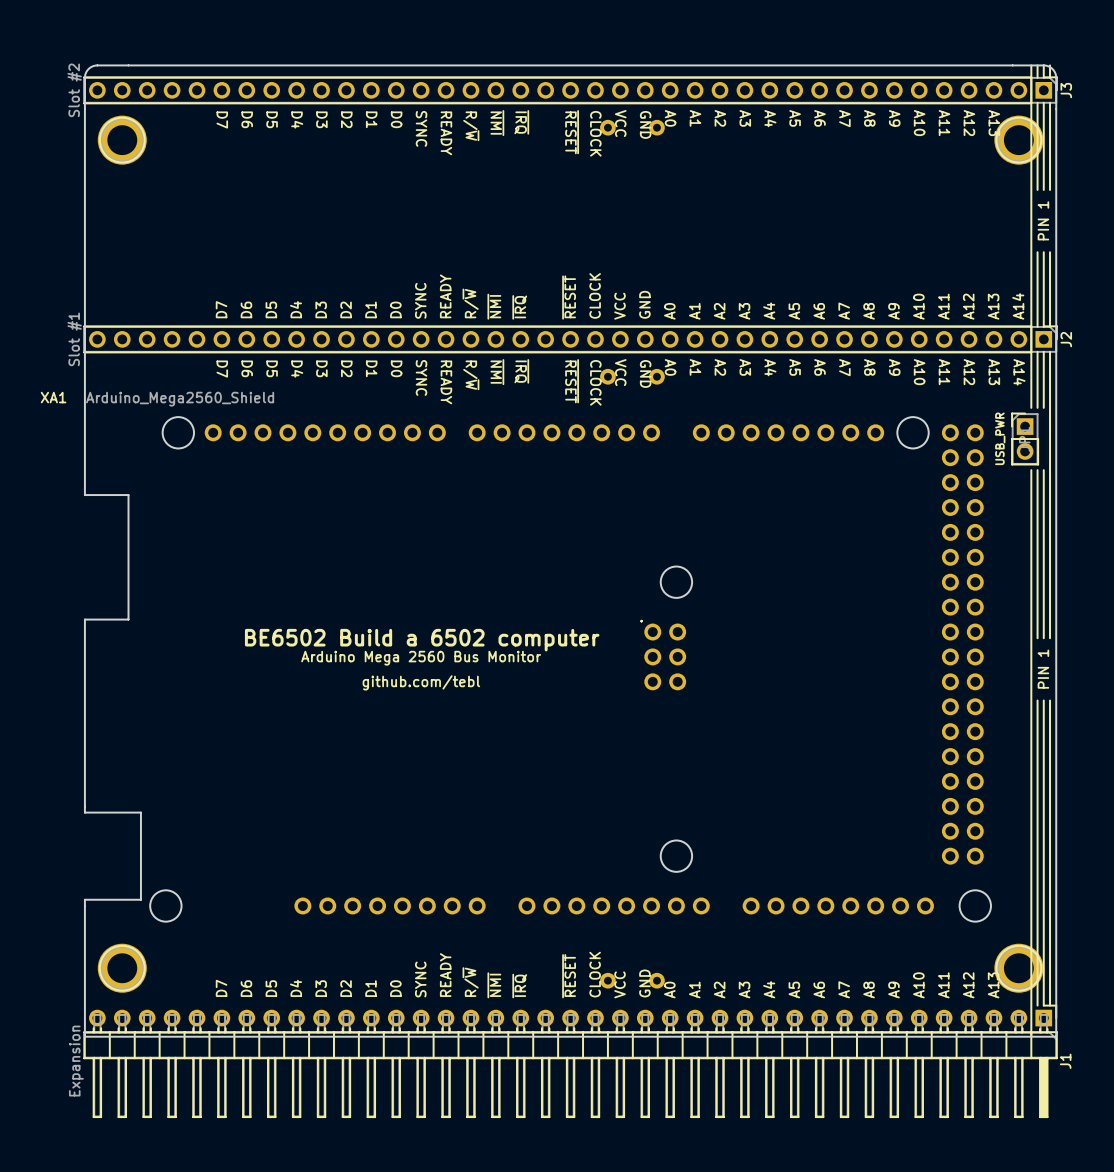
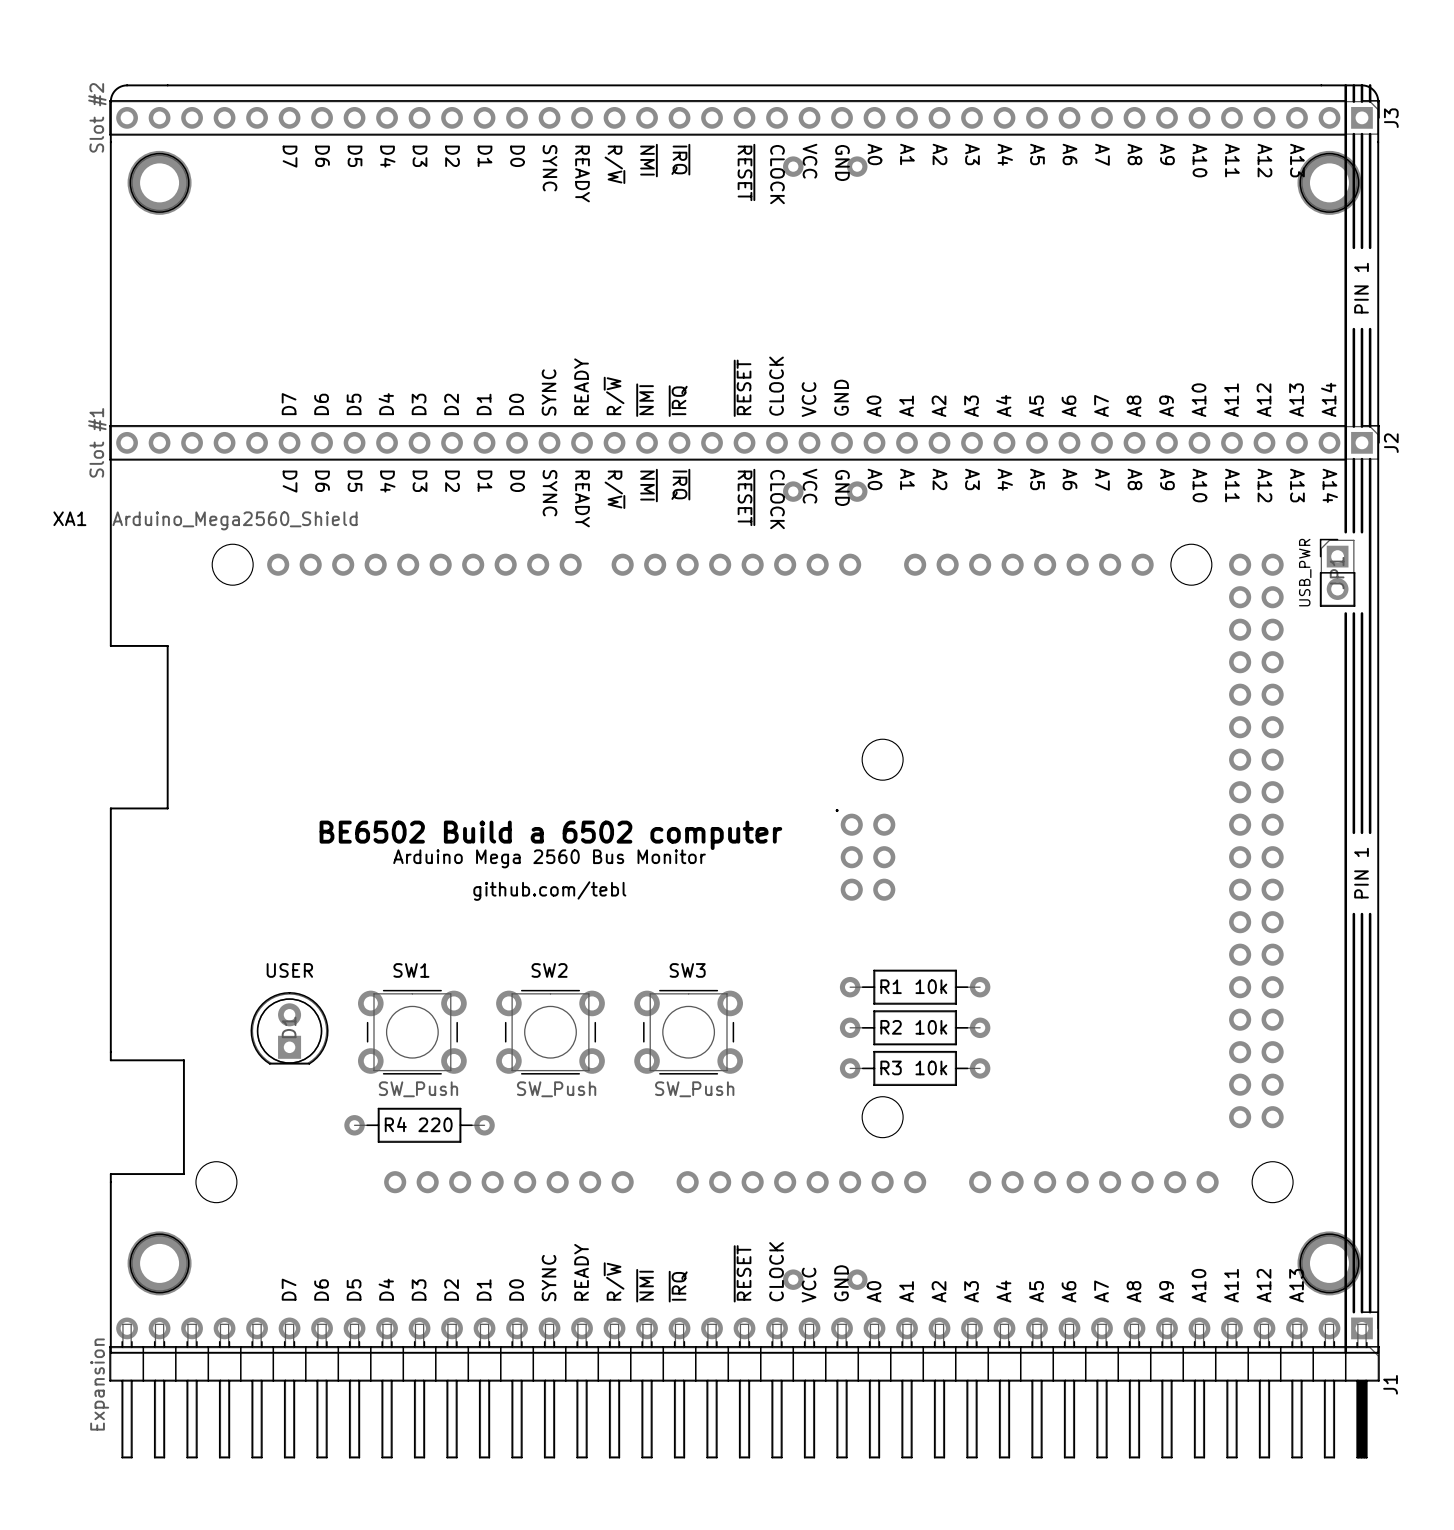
R1: none -> 10k (915, 987)
R2: none -> 10k (915, 1027)
part: none -> USER (289, 1028)
SW1: none -> SW_Push (412, 1032)
SW2: none -> SW_Push (550, 1032)
SW3: none -> SW_Push (688, 1032)
R3: none -> 10k (915, 1068)
R4: none -> 220 (419, 1125)

